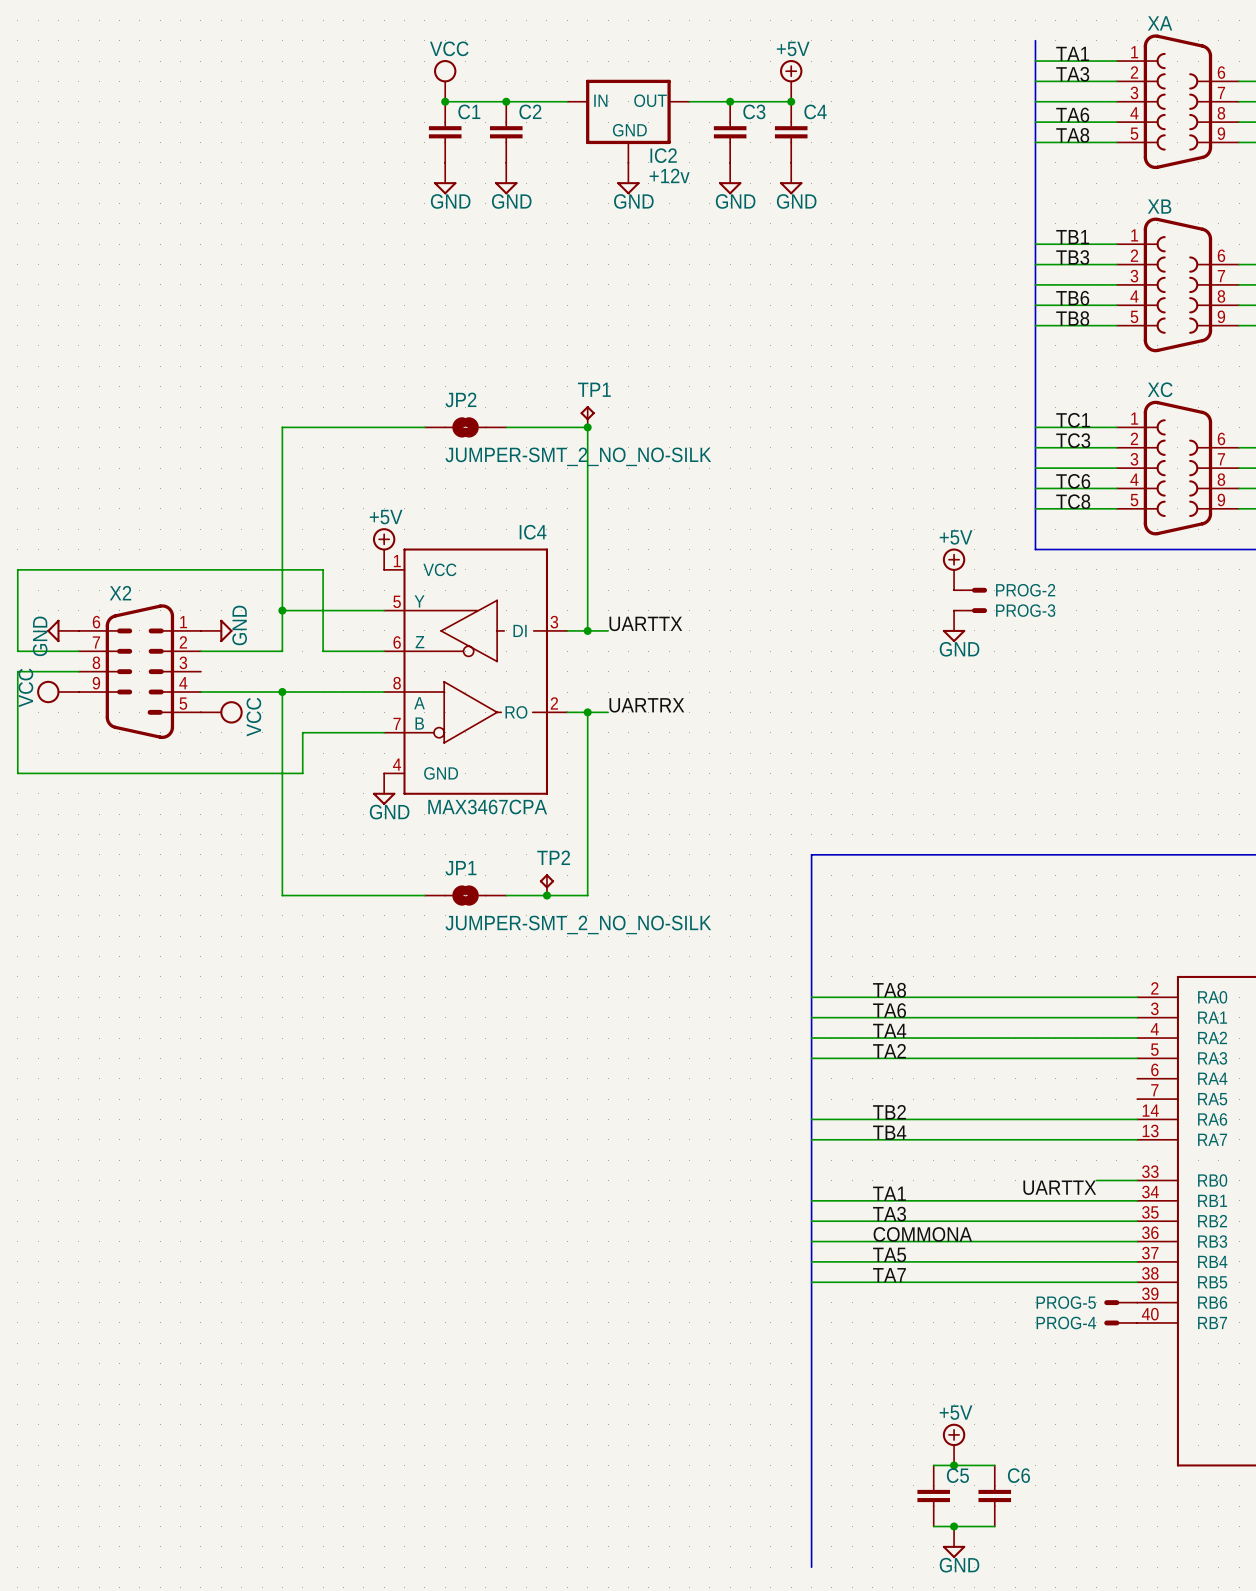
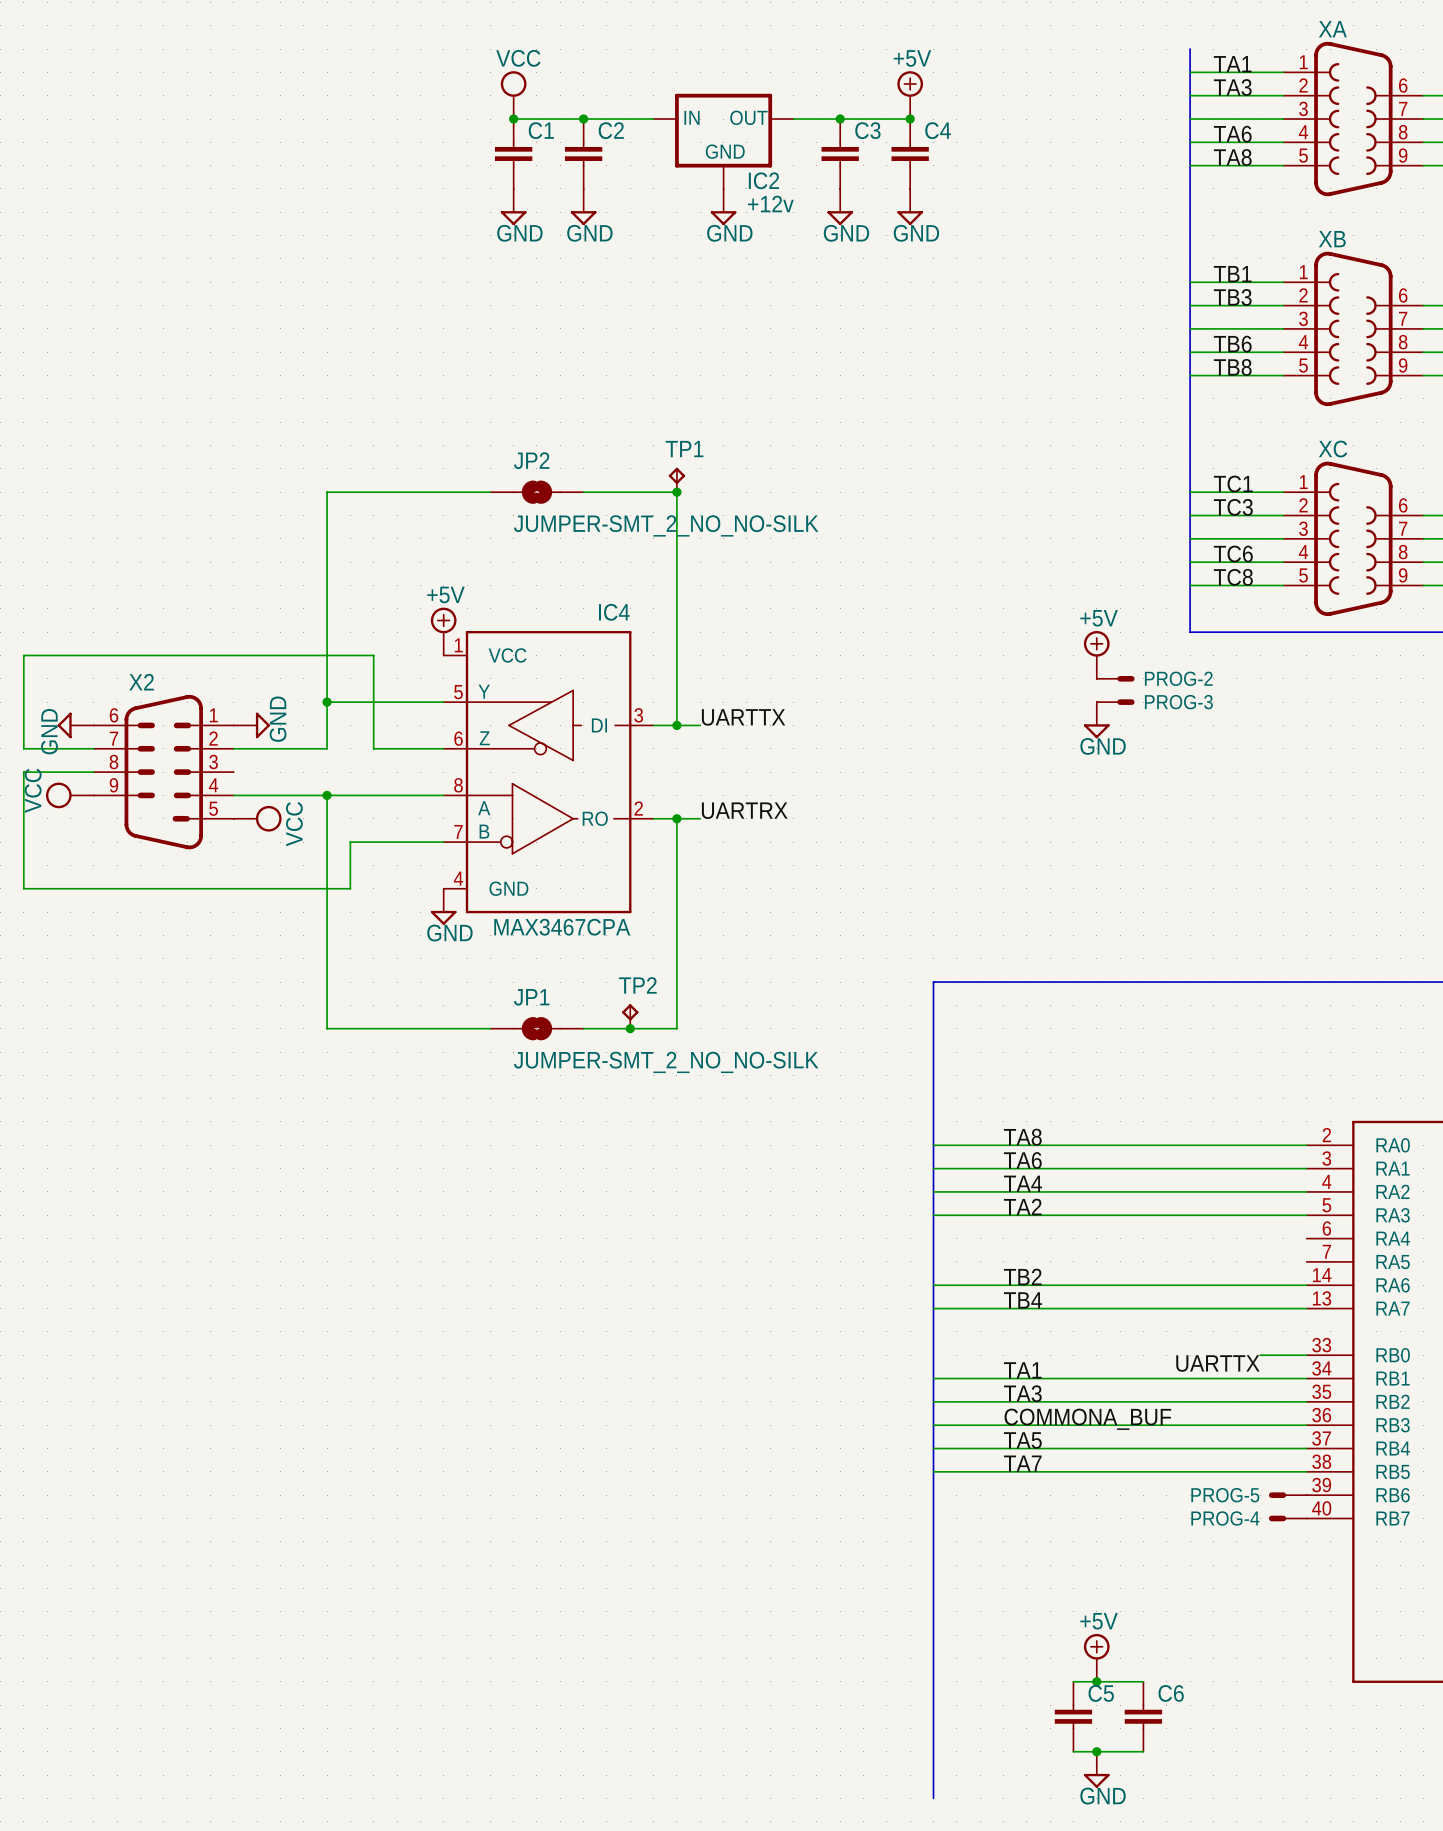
label: COMMONA (922, 1234) -> COMMONA_BUF (1087, 1419)

